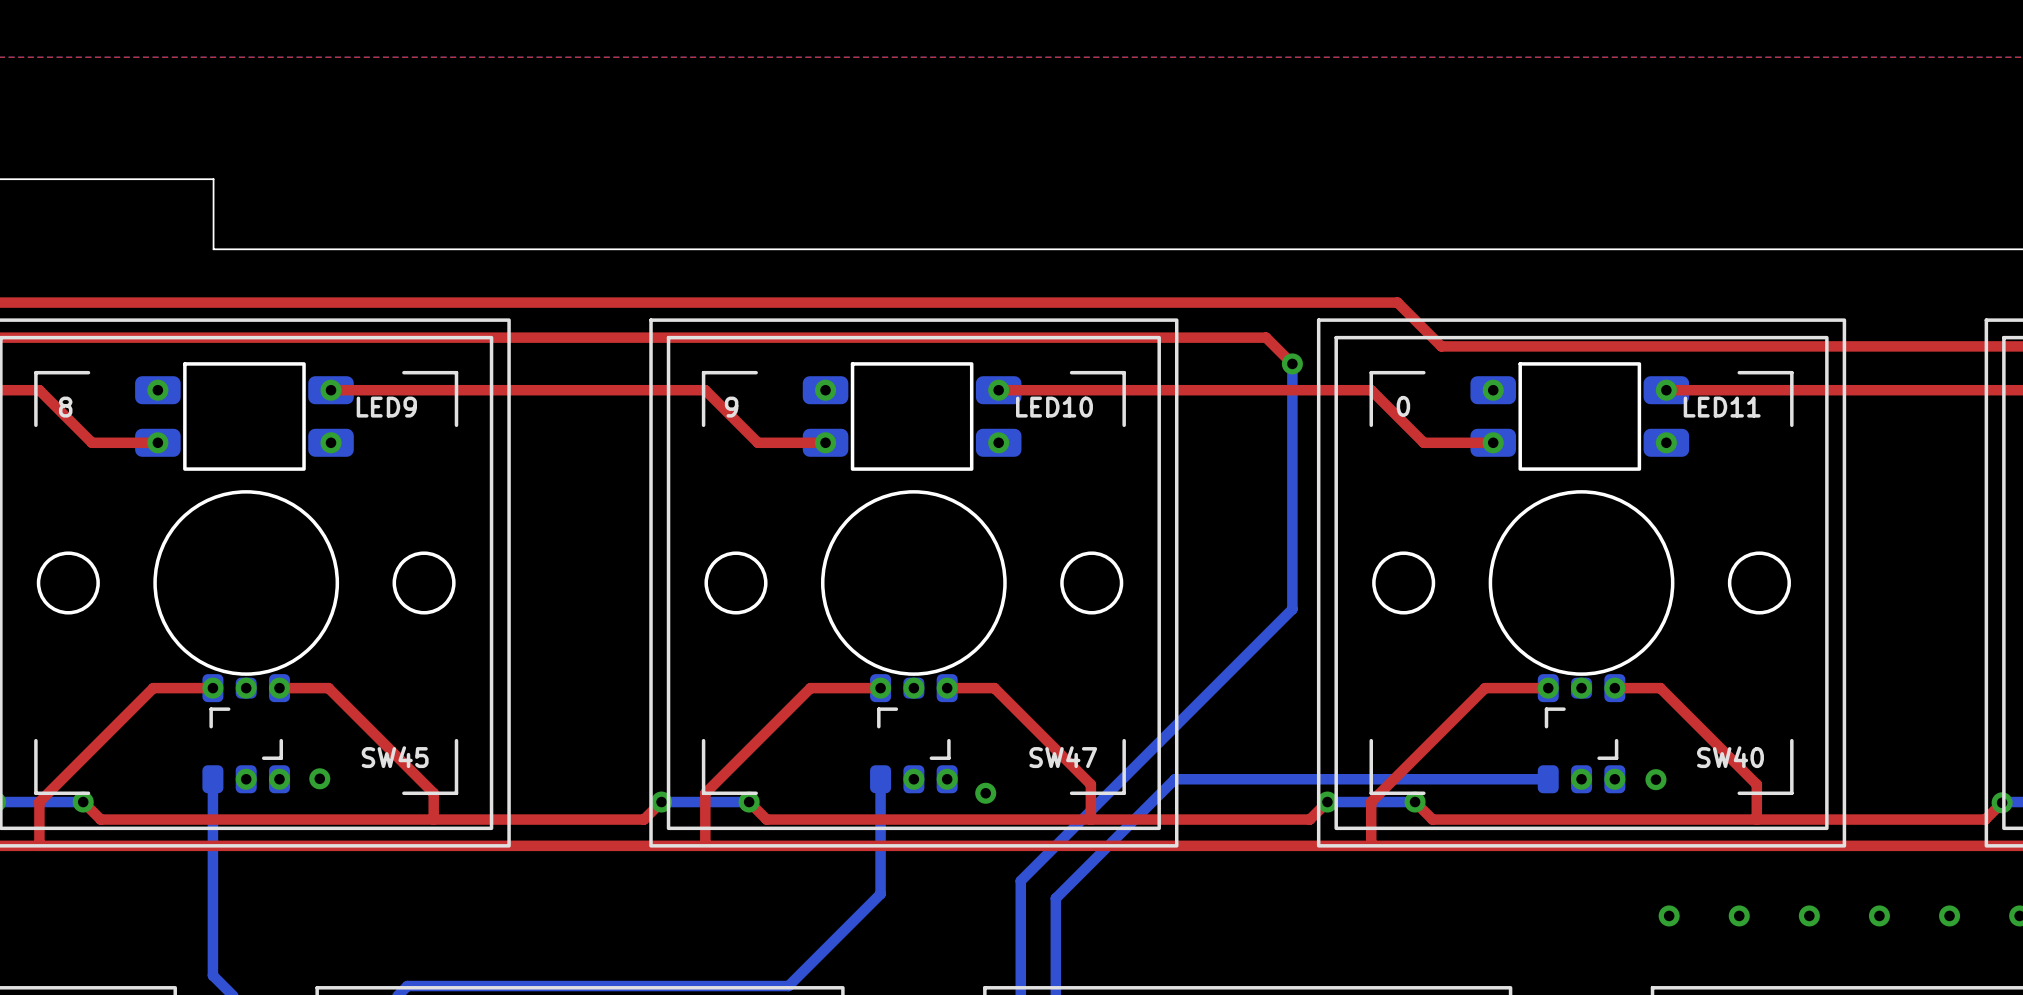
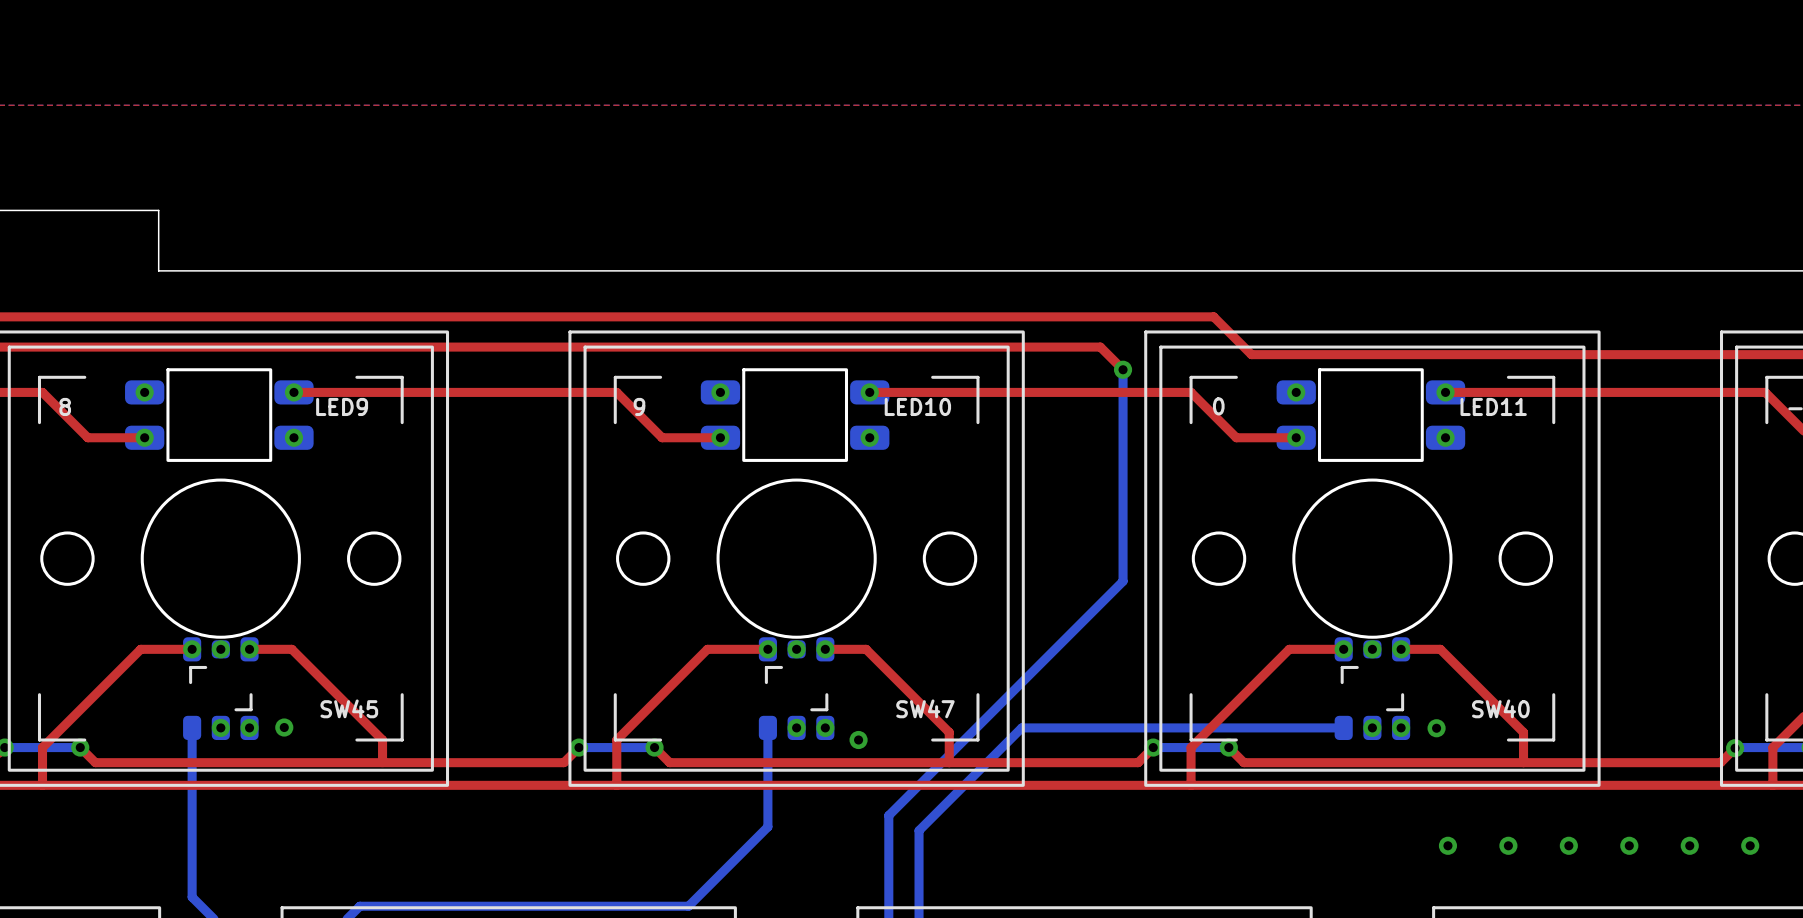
board edge: (174, 179) (213, 179) (213, 249) -> (158, 210) (158, 270) (192, 270)

